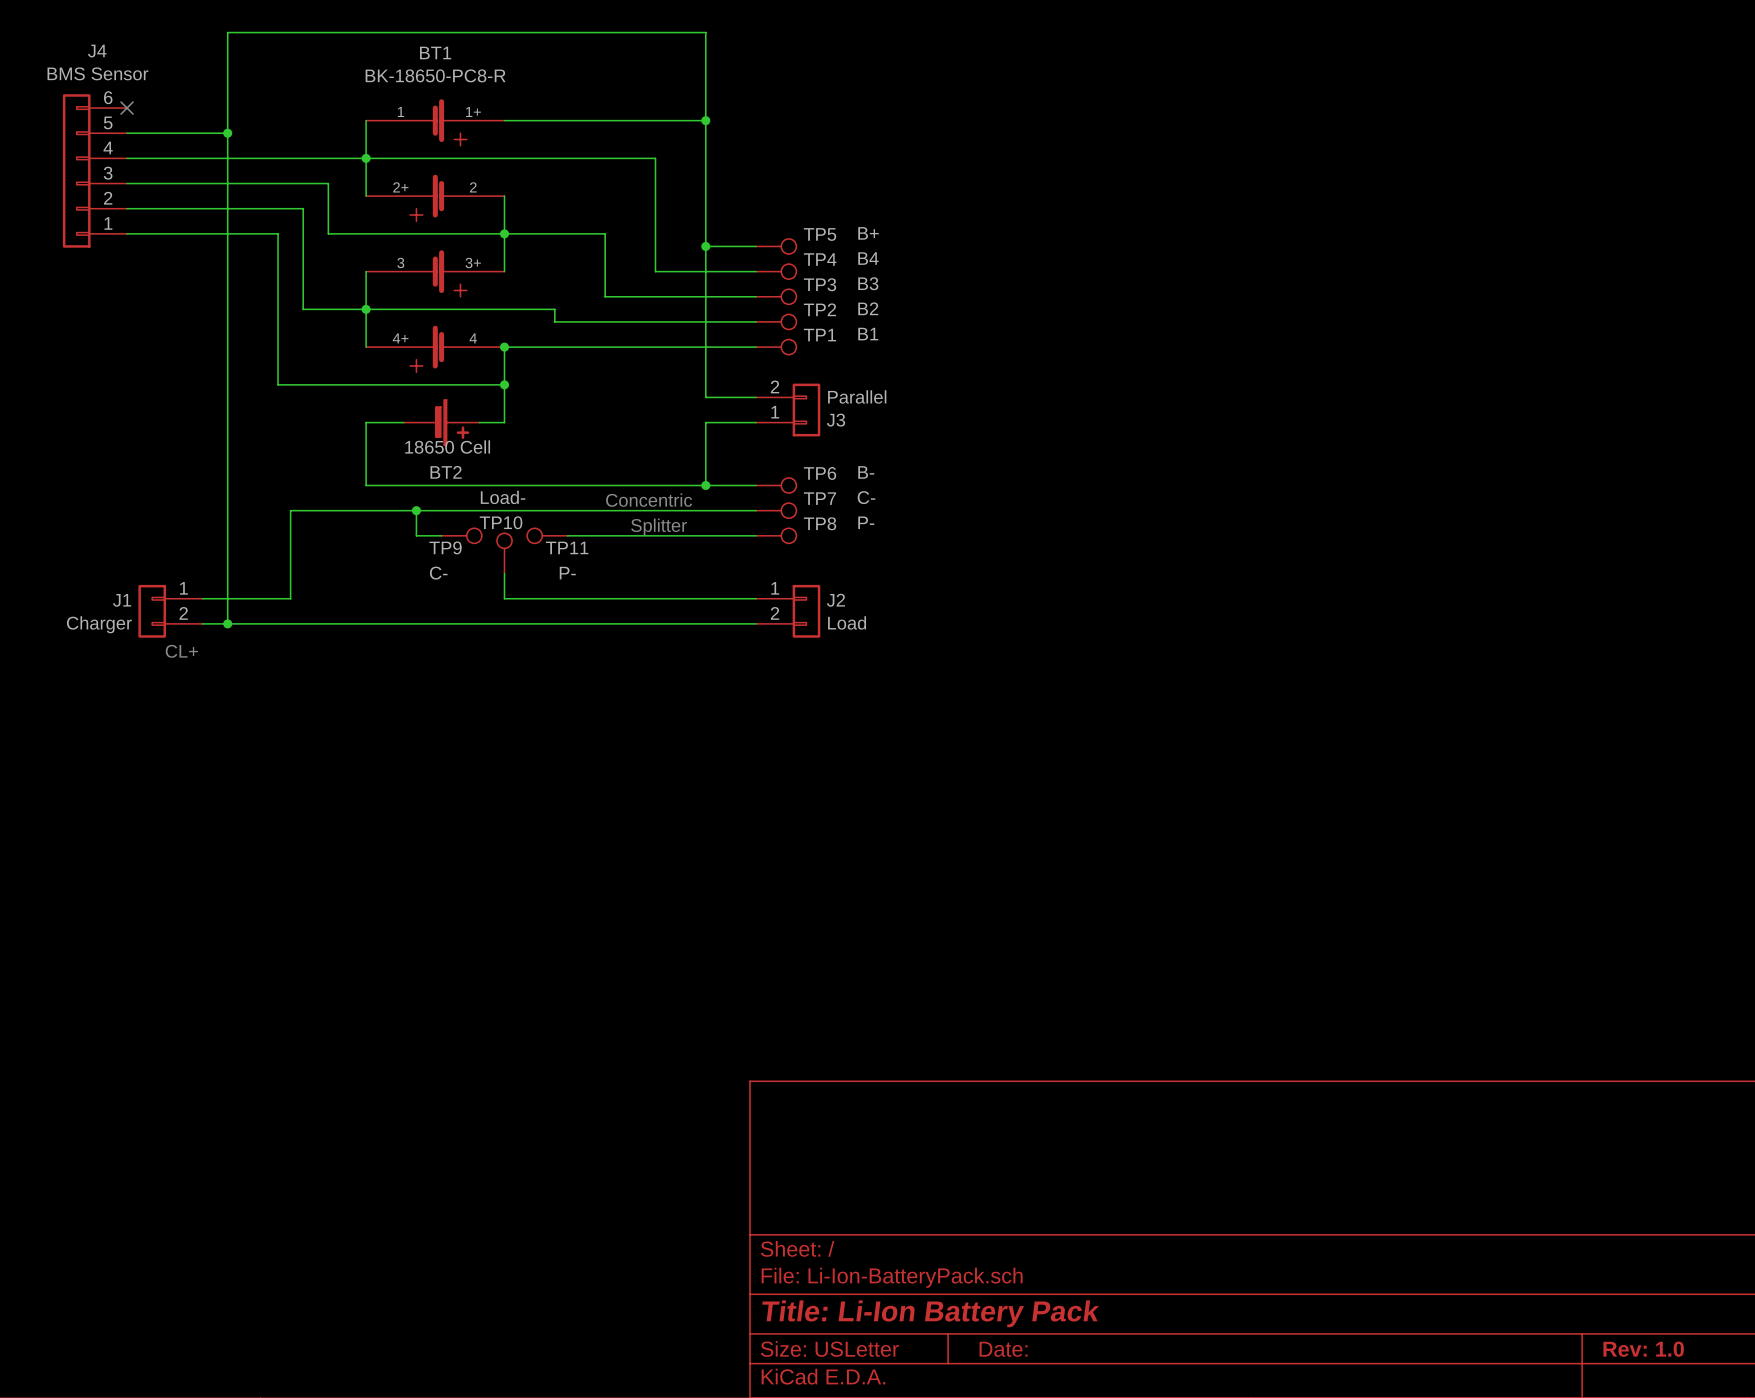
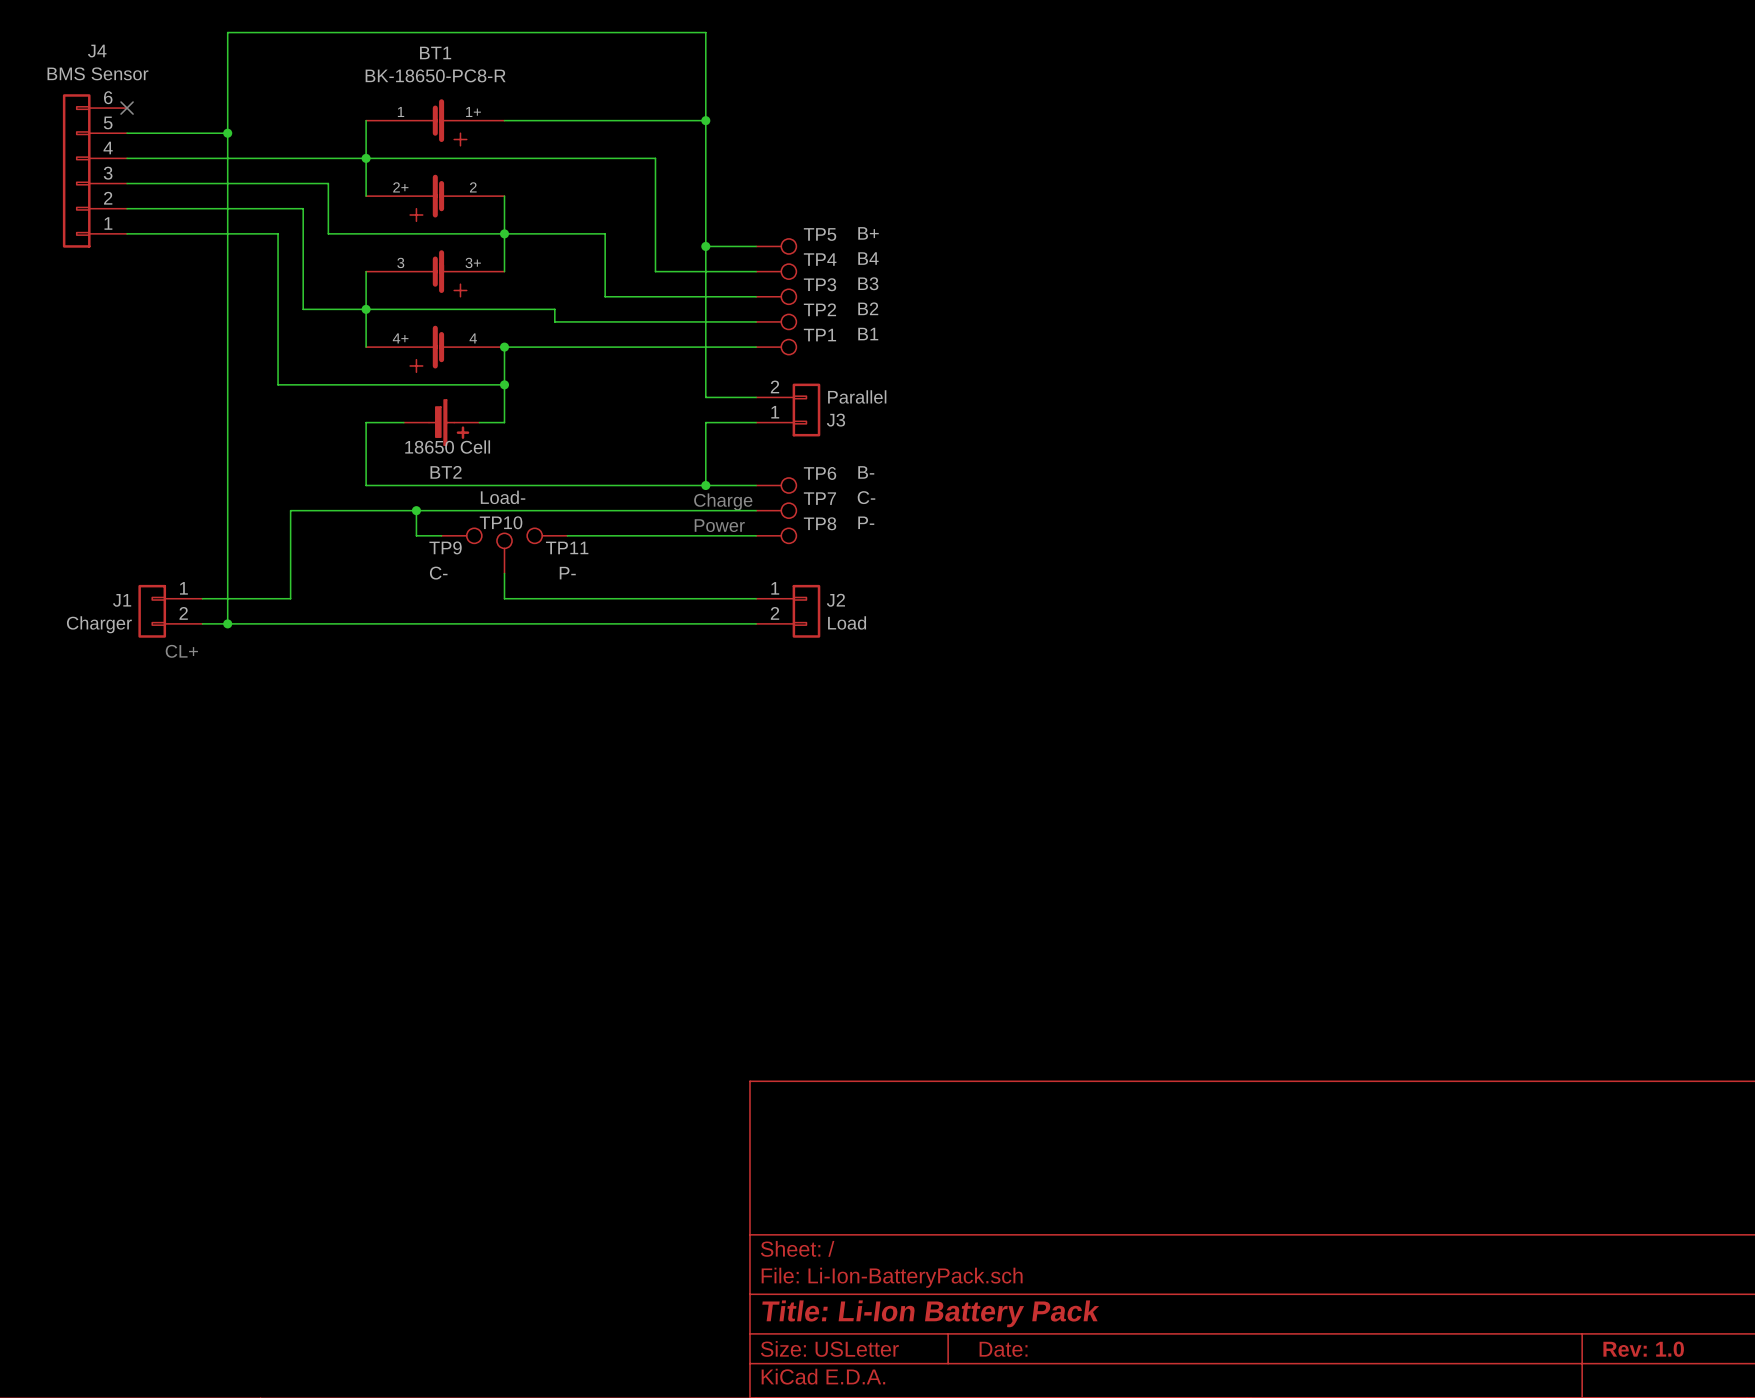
text: Concentric (649, 500) -> none
text: none -> Charge (723, 501)
text: none -> Power (719, 525)
text: Splitter (659, 527) -> none

